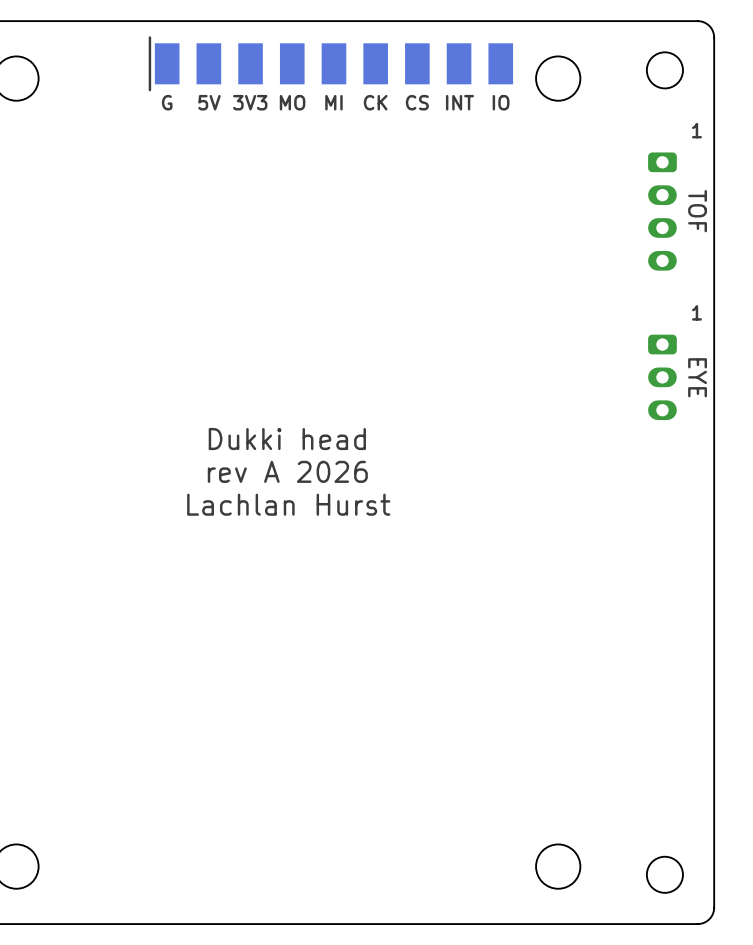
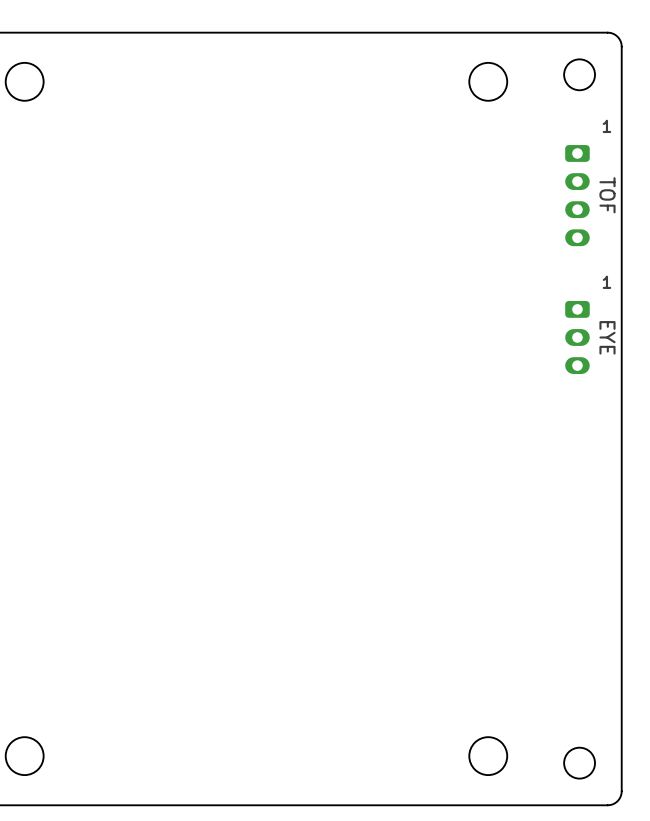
part: (330, 63) -> none
text: Dukki head (287, 439) -> none
text: rev A 2026 (287, 471) -> none
text: Lachlan Hurst (288, 504) -> none

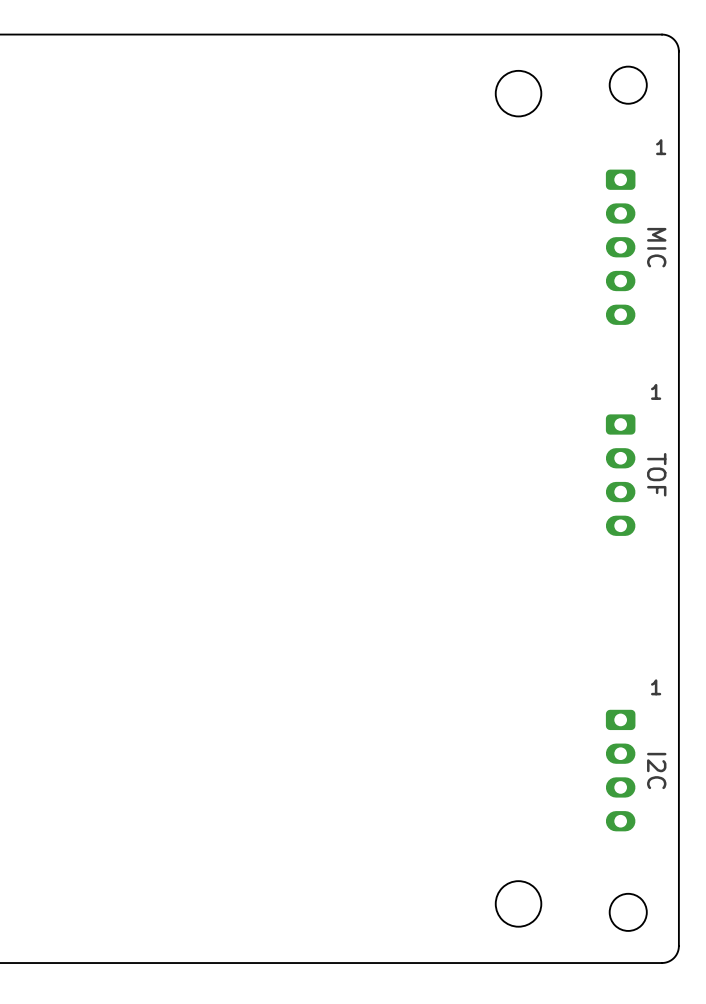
part position: (577, 195) -> (620, 475)
text position: TOF (607, 195) -> TOF (656, 474)
part: none -> (620, 247)
text: none -> MIC (656, 247)
text position: 1 (606, 282) -> 1 (656, 391)
part: (577, 337) -> none
text: EYE (607, 337) -> none
text: none -> 1 (656, 687)
part: none -> (620, 770)
text: none -> I2C (656, 770)

